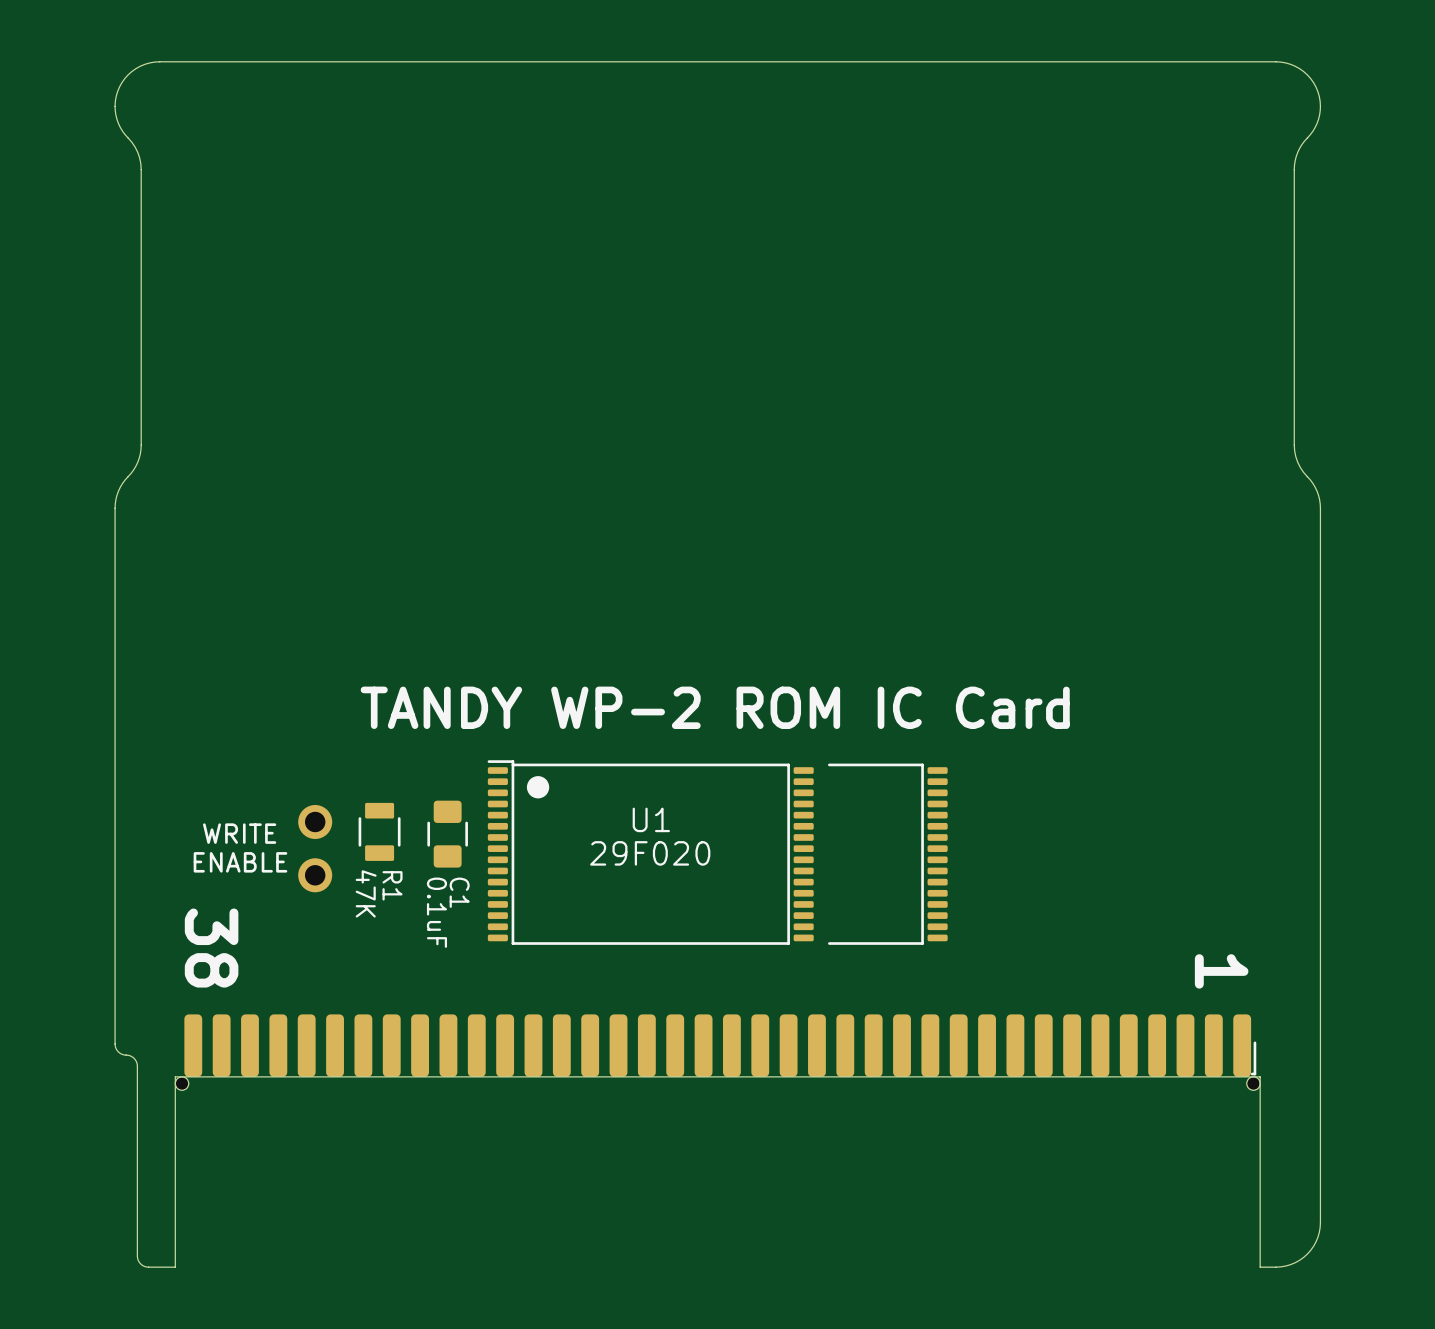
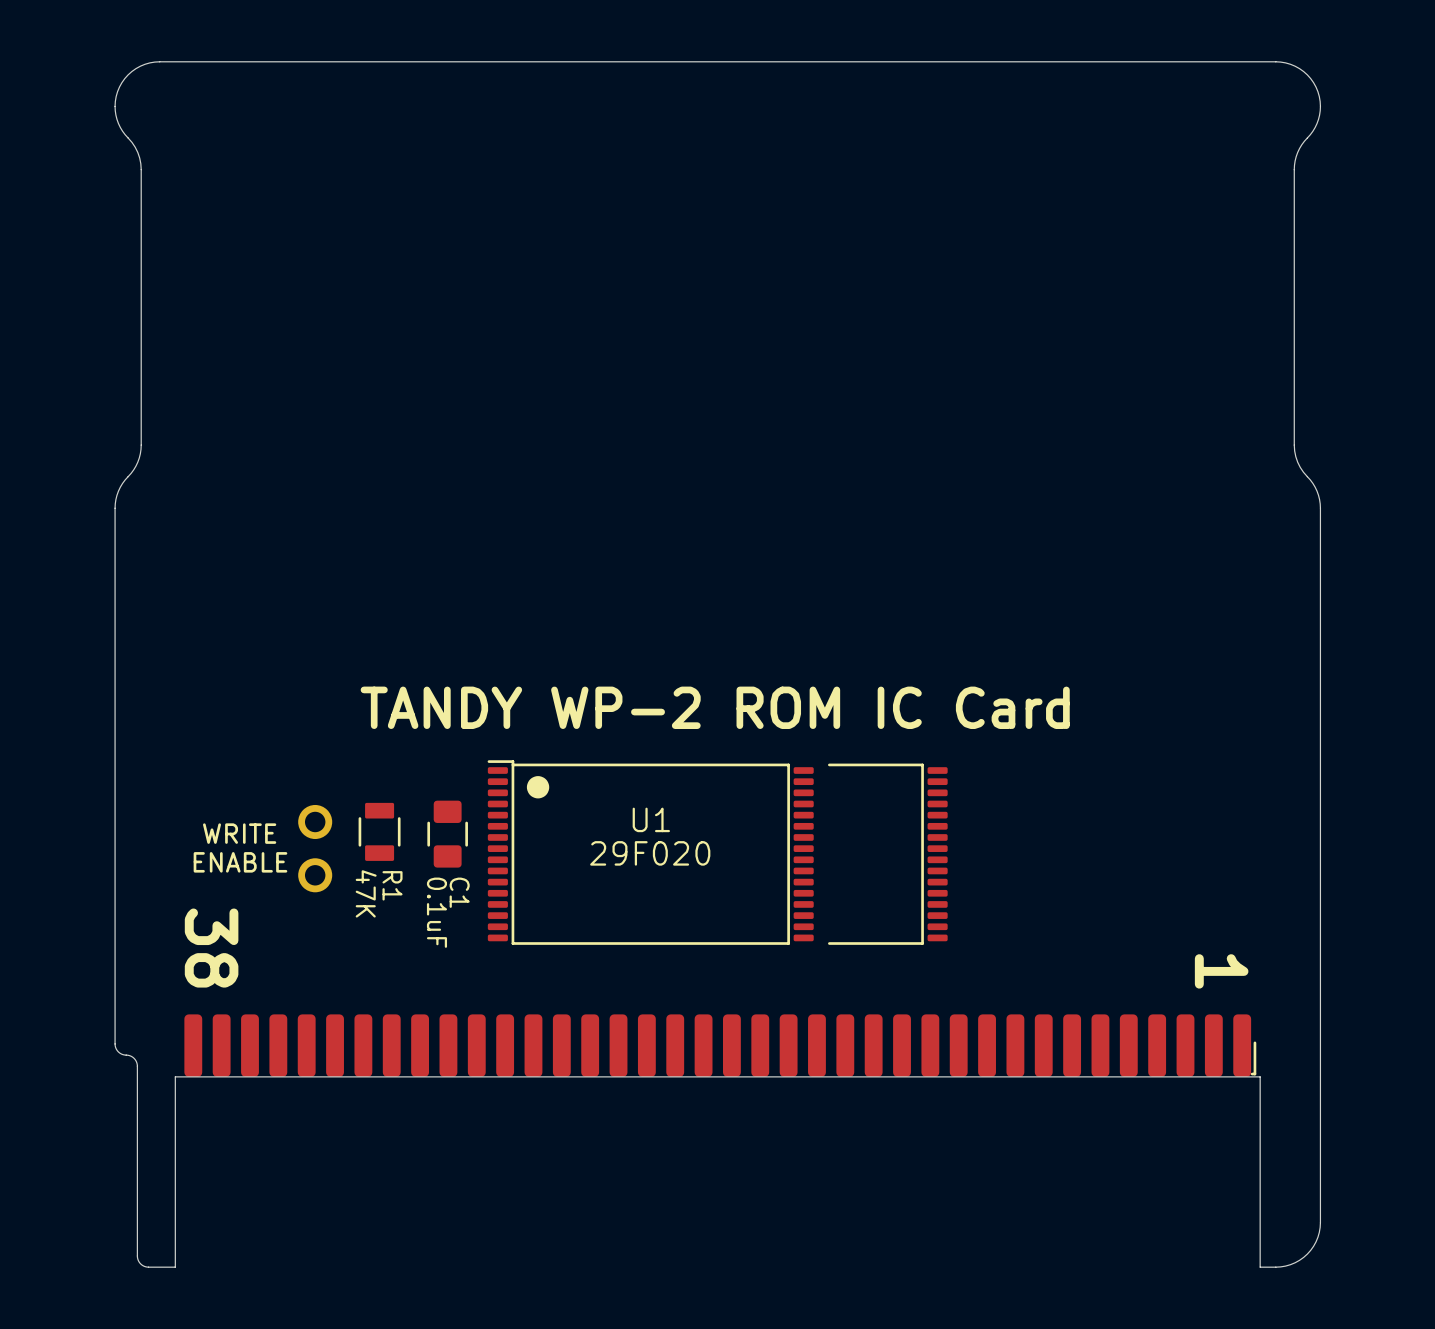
part: (182, 1083) -> none
part: (1253, 1083) -> none

